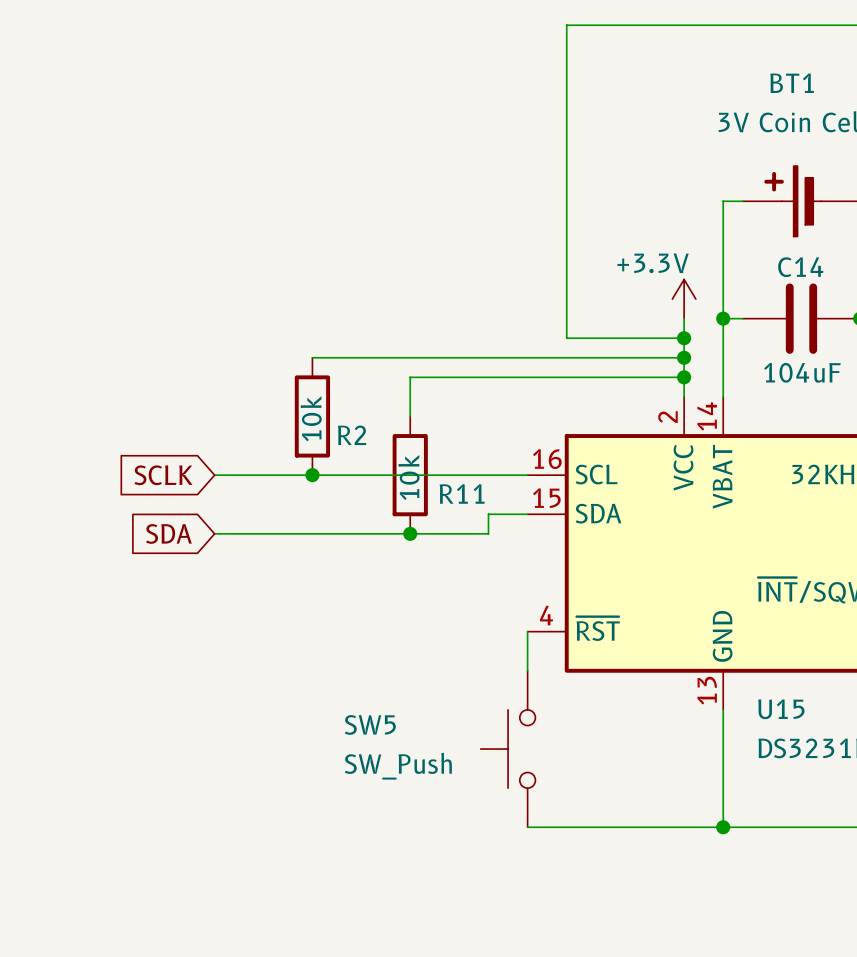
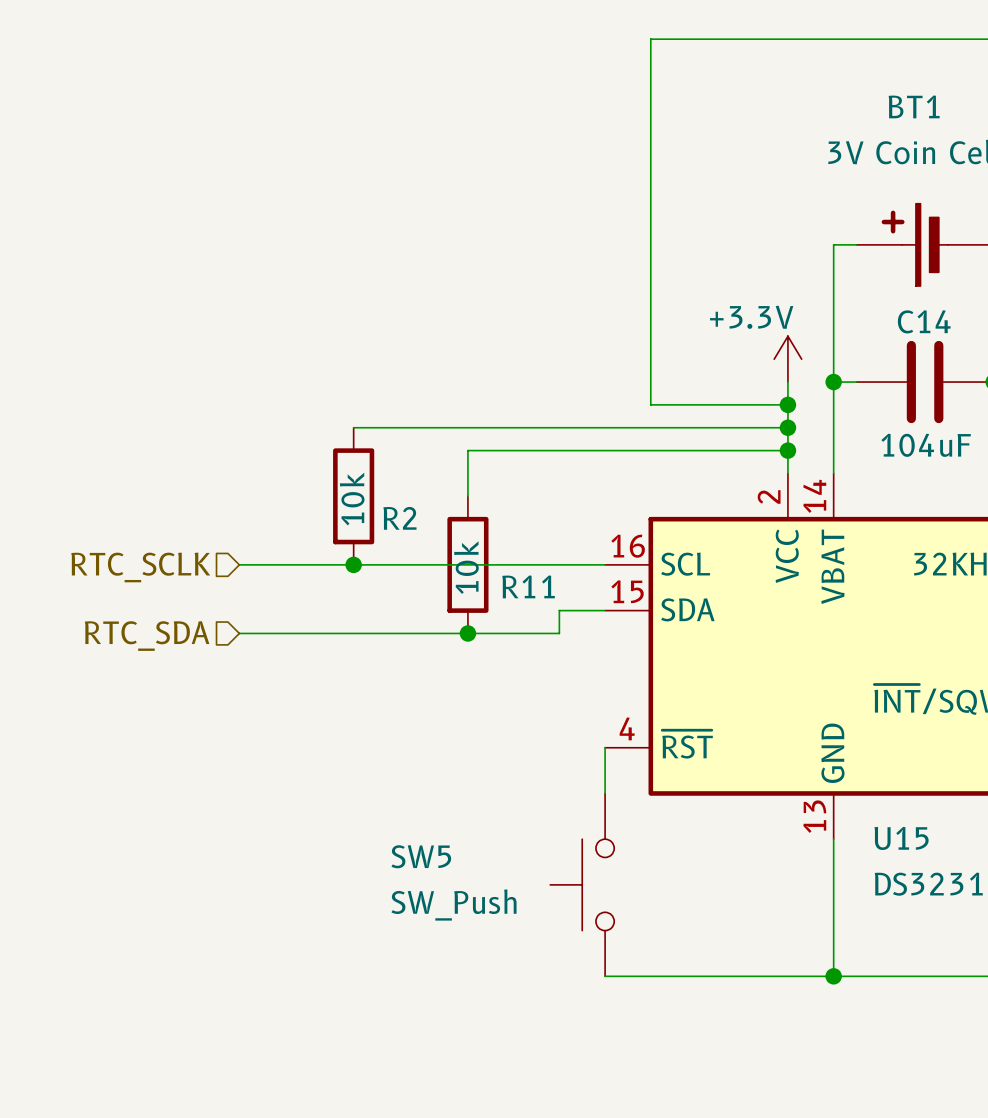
global label: SCLK (163, 475) -> none
hierarchical label: none -> RTC_SCLK (140, 567)
global label: SDA (168, 533) -> none
hierarchical label: none -> RTC_SDA (147, 636)

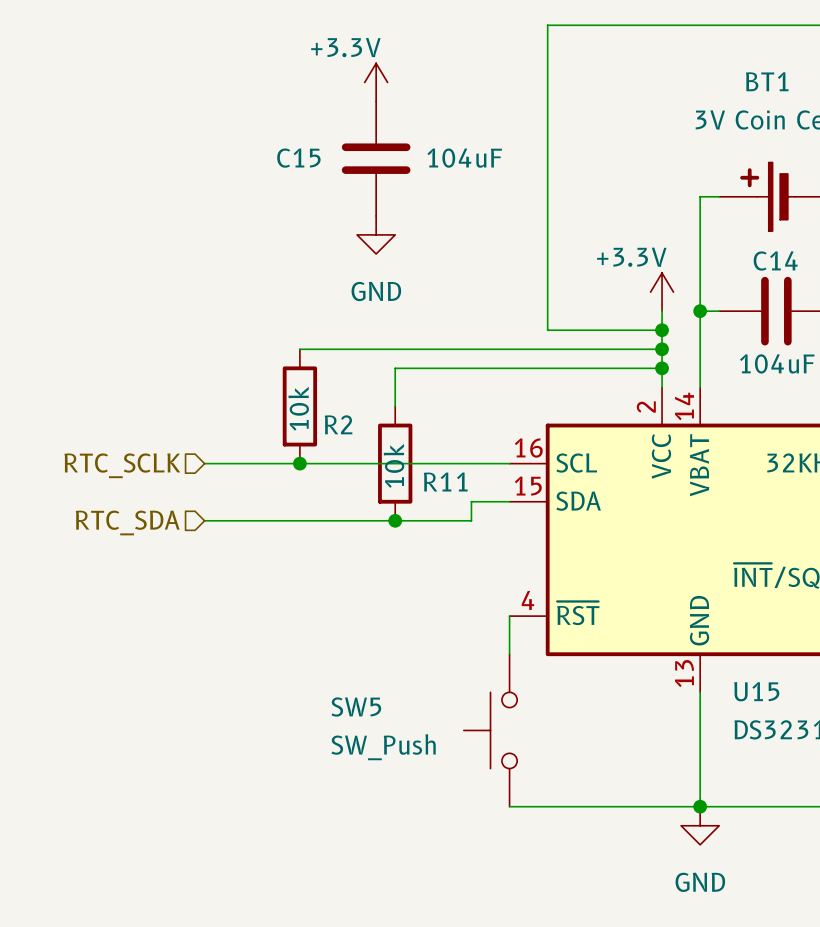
power symbol: none -> +3.3V (376, 82)
C15: none -> 104uF (376, 158)
power symbol: none -> GND (376, 234)
power symbol: none -> GND (700, 825)

